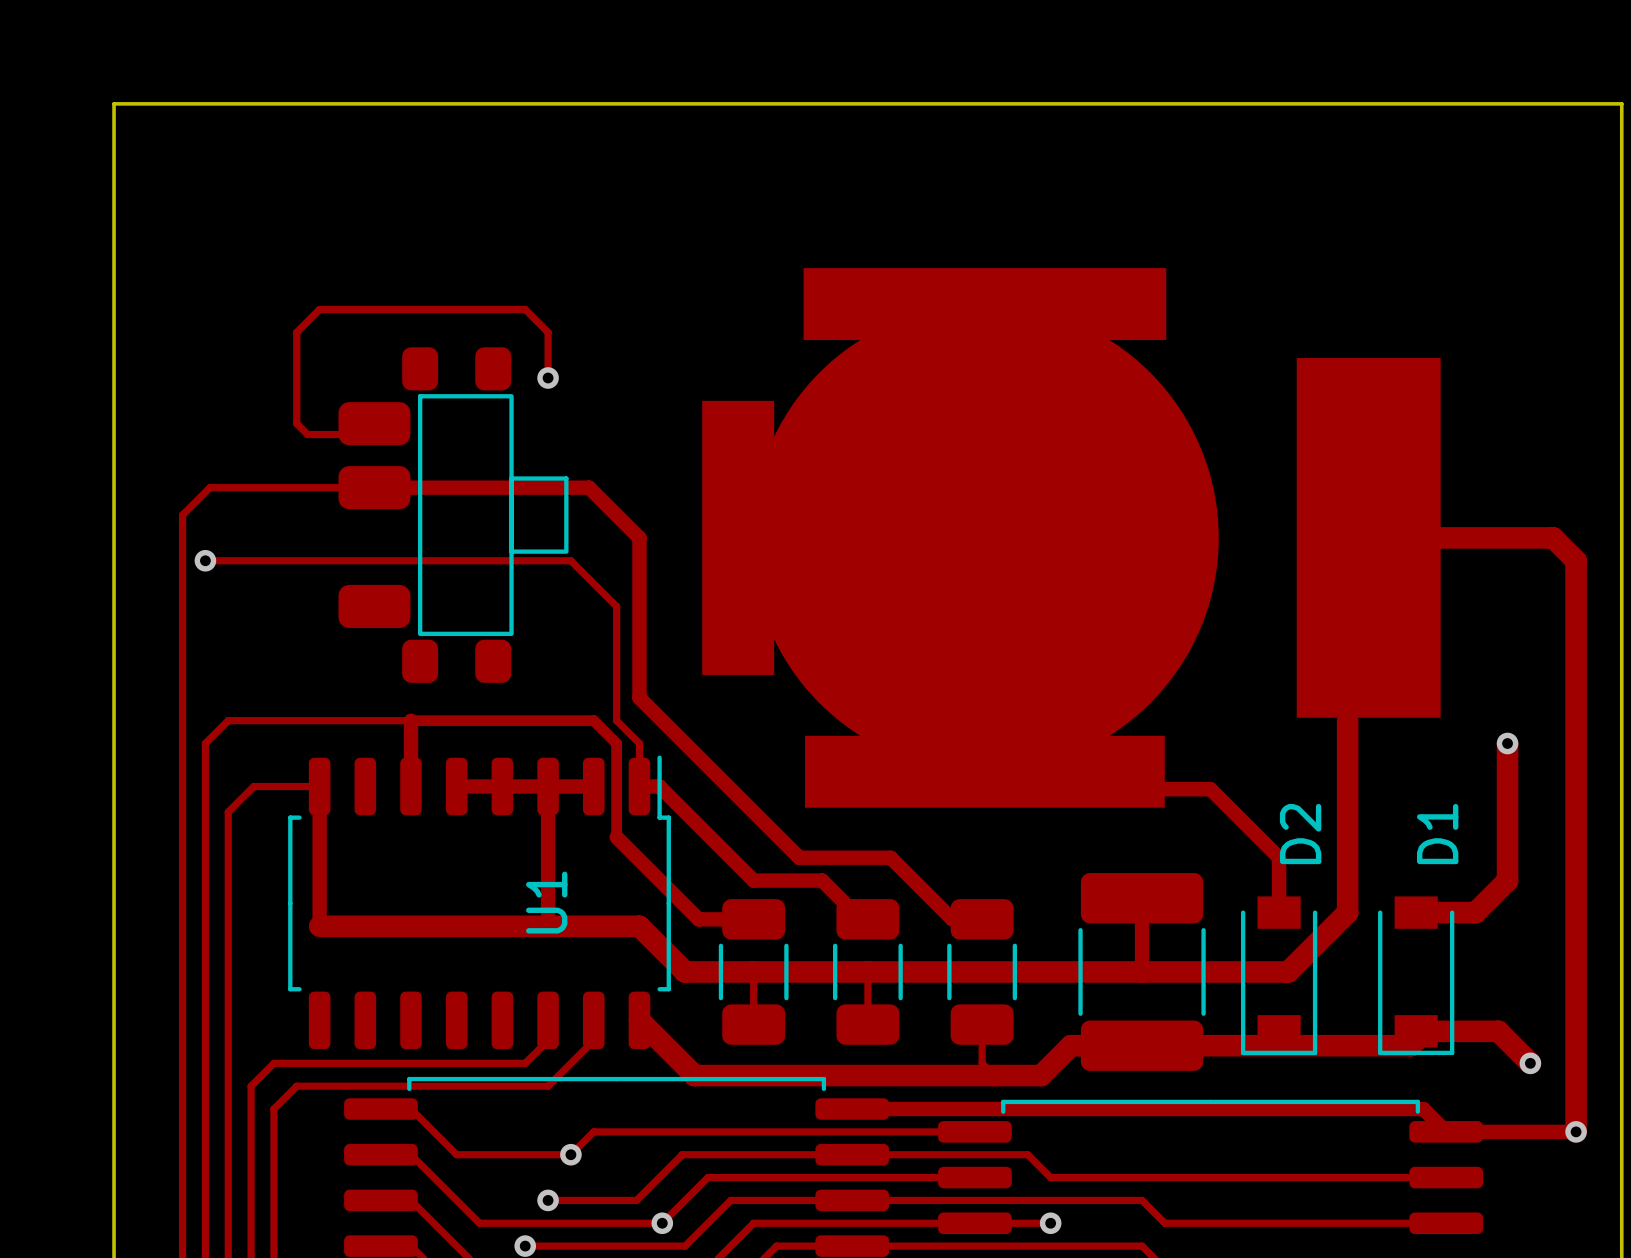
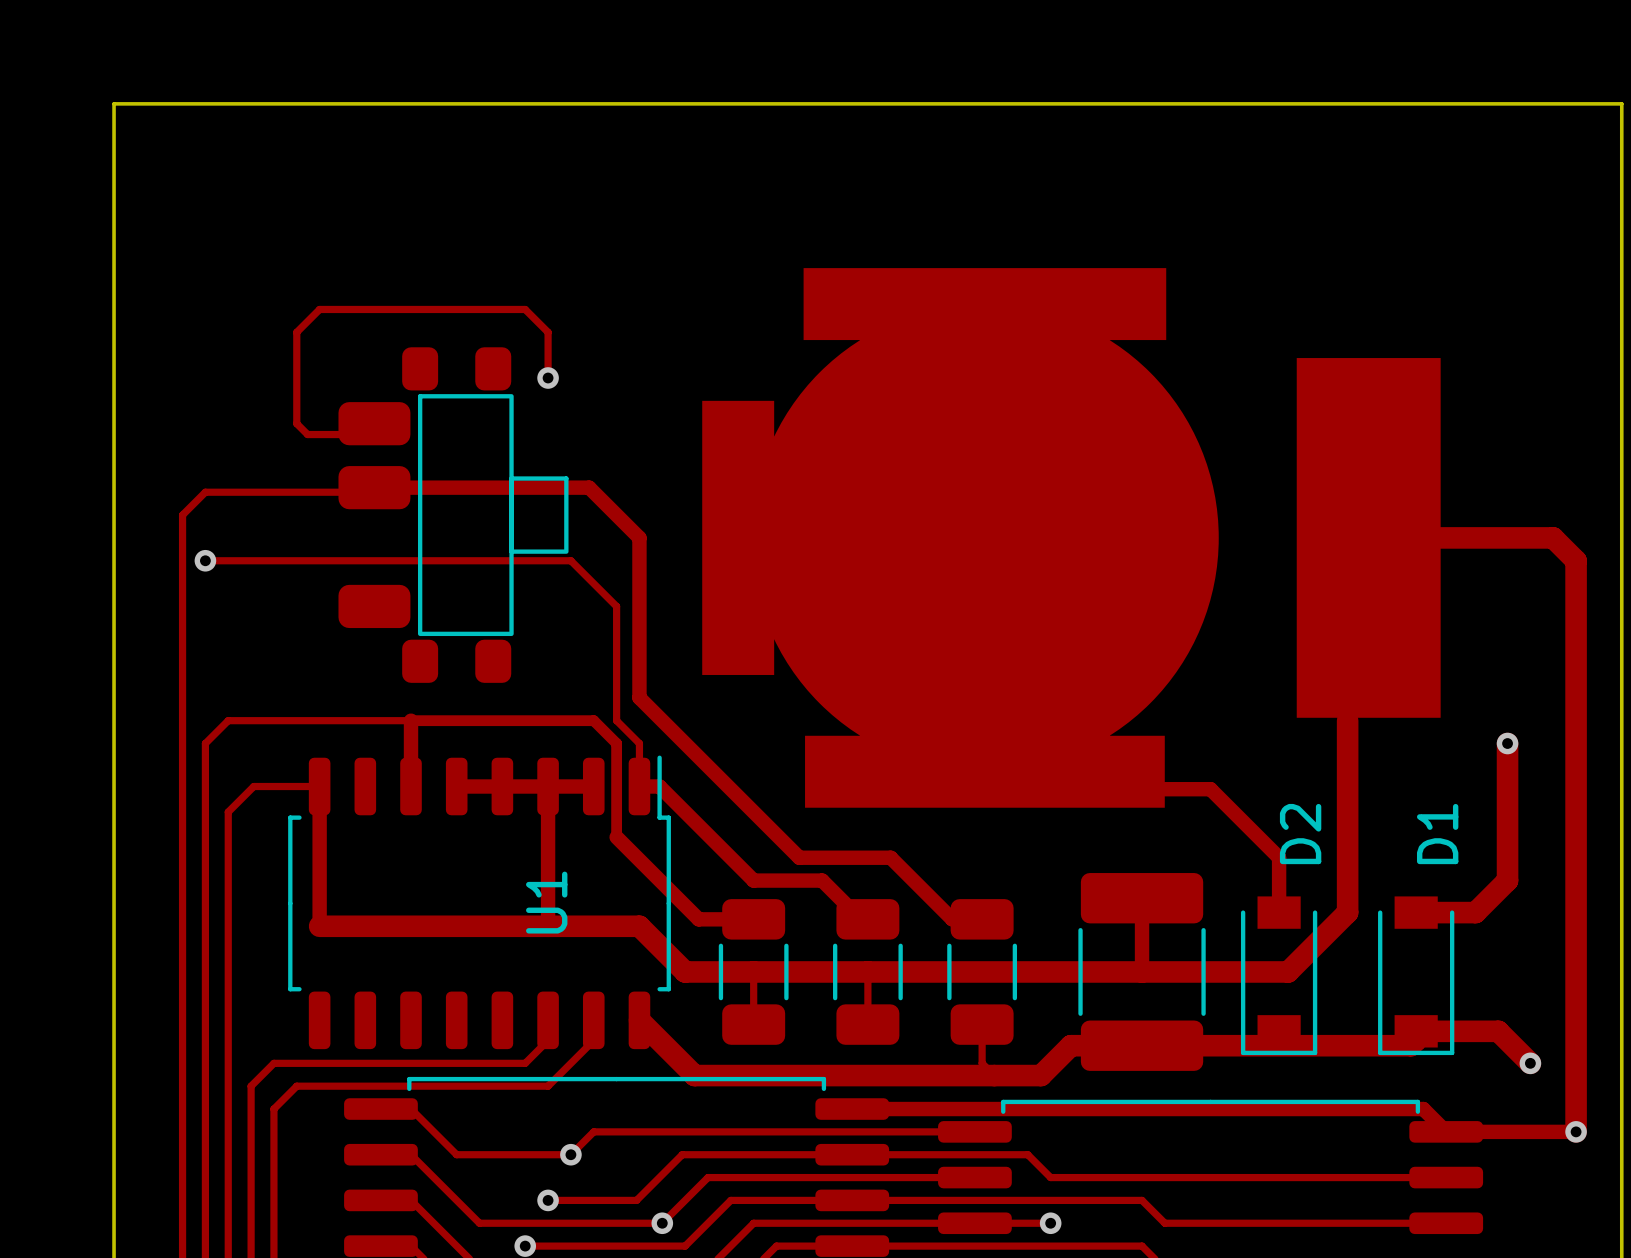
track: (374, 487) (209, 487) (205, 492) -> (342, 492) (205, 492)

